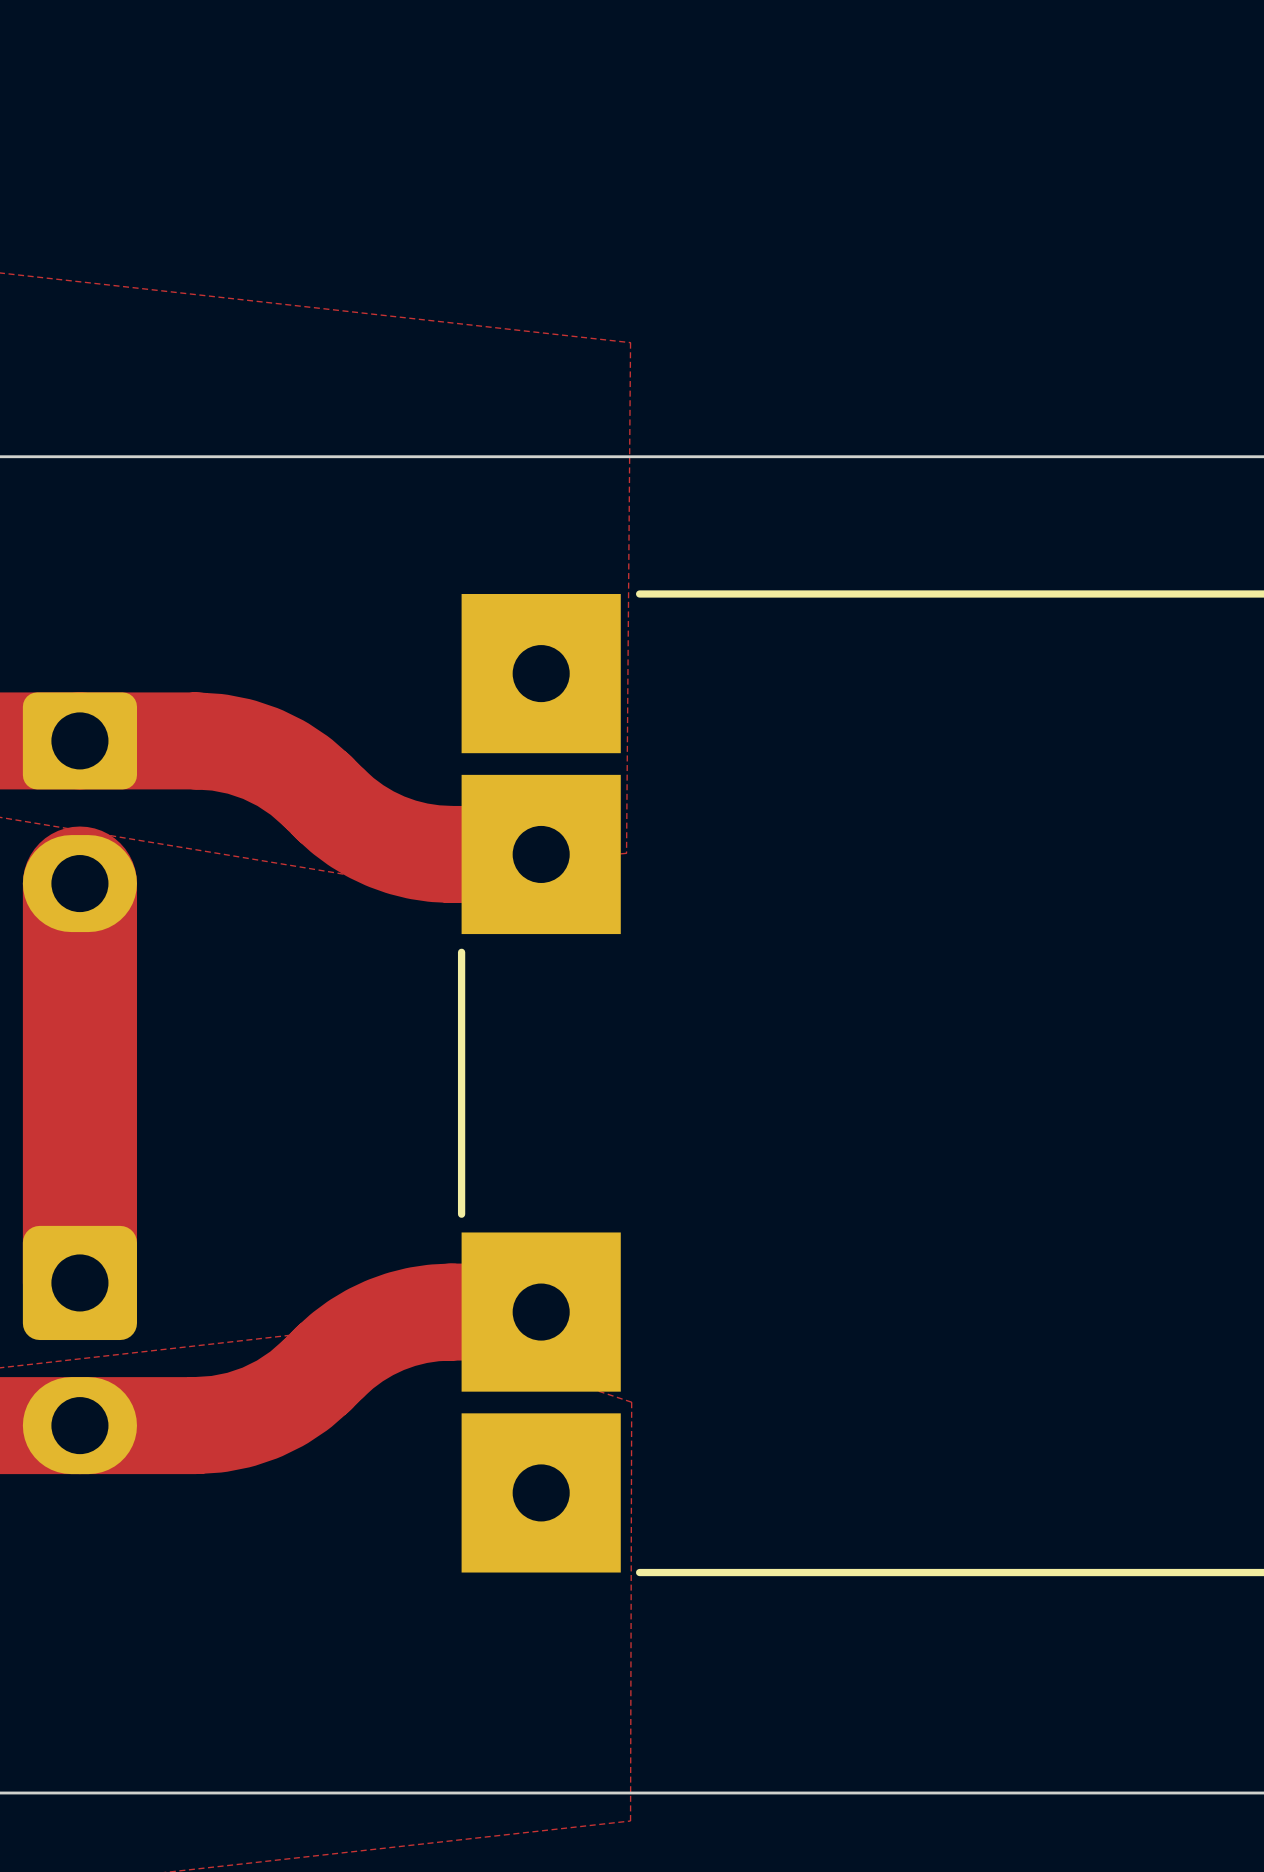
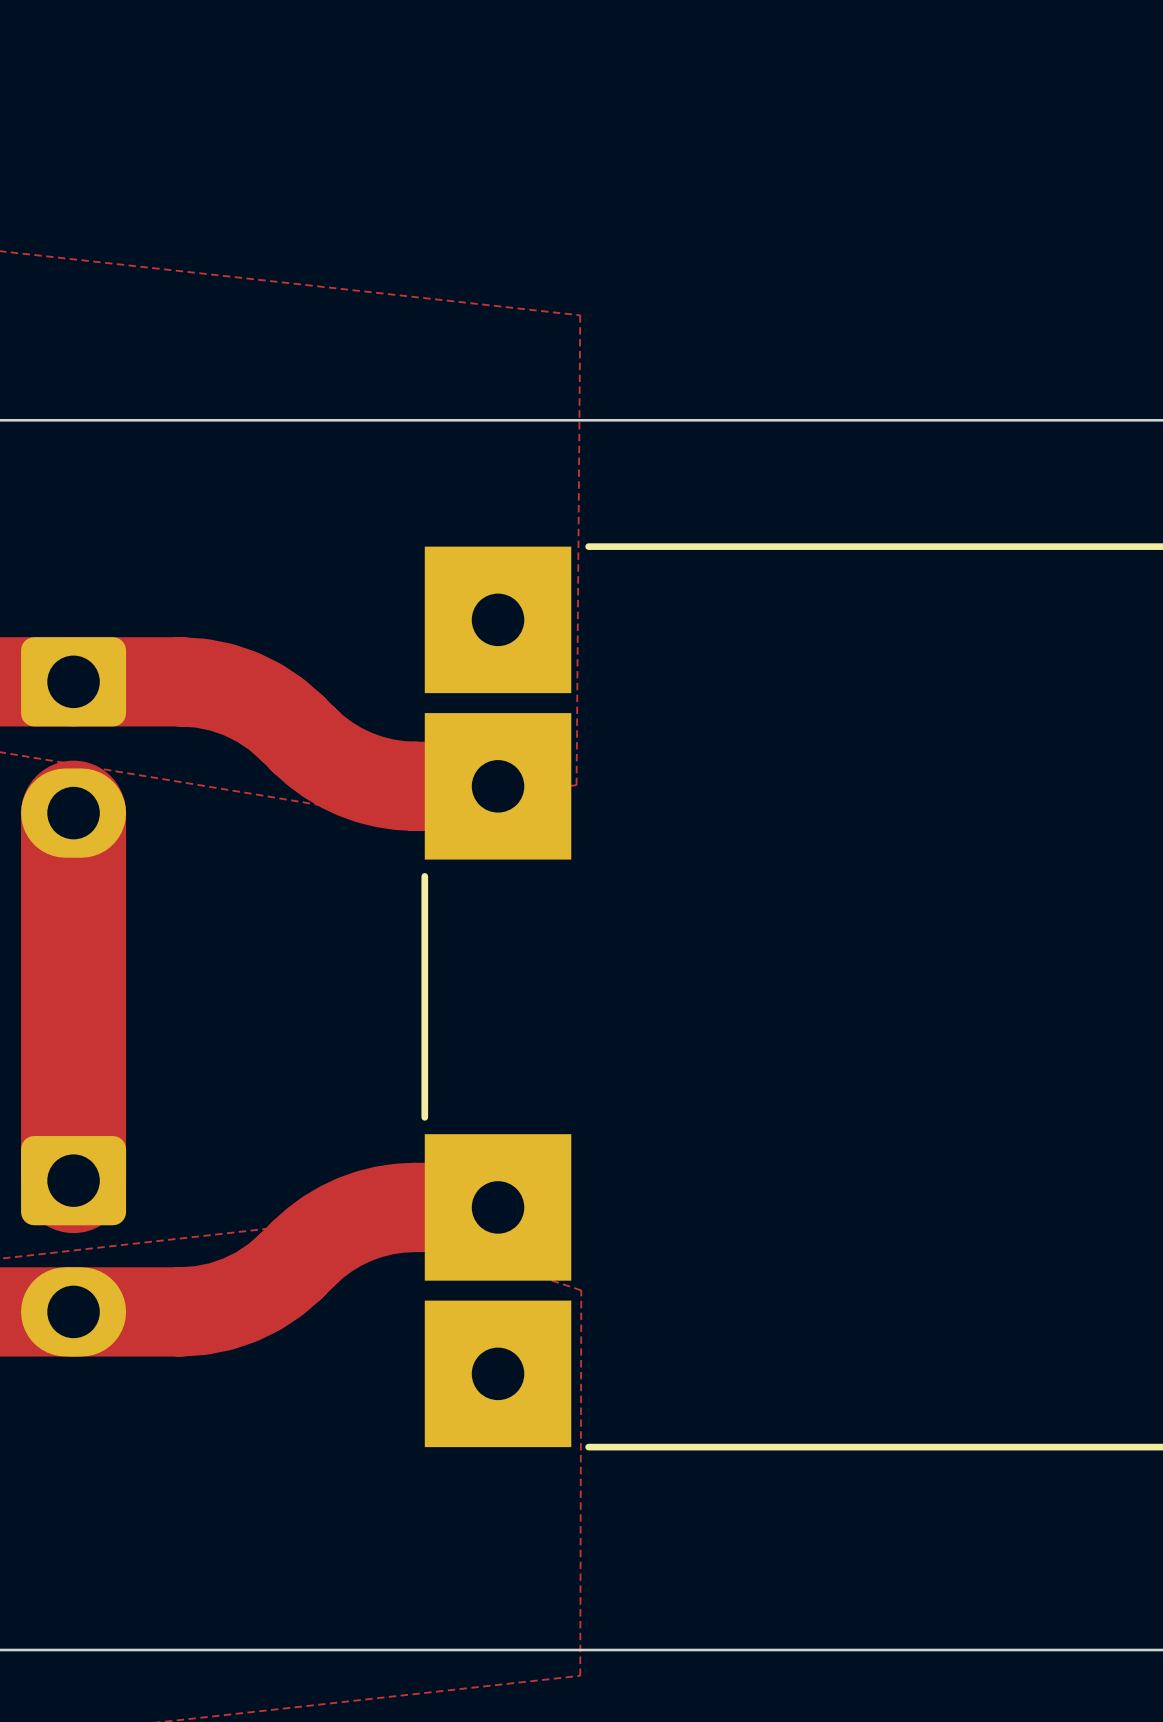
part footprint: [22, 1225, 137, 1475] -> [21, 1136, 127, 1357]

